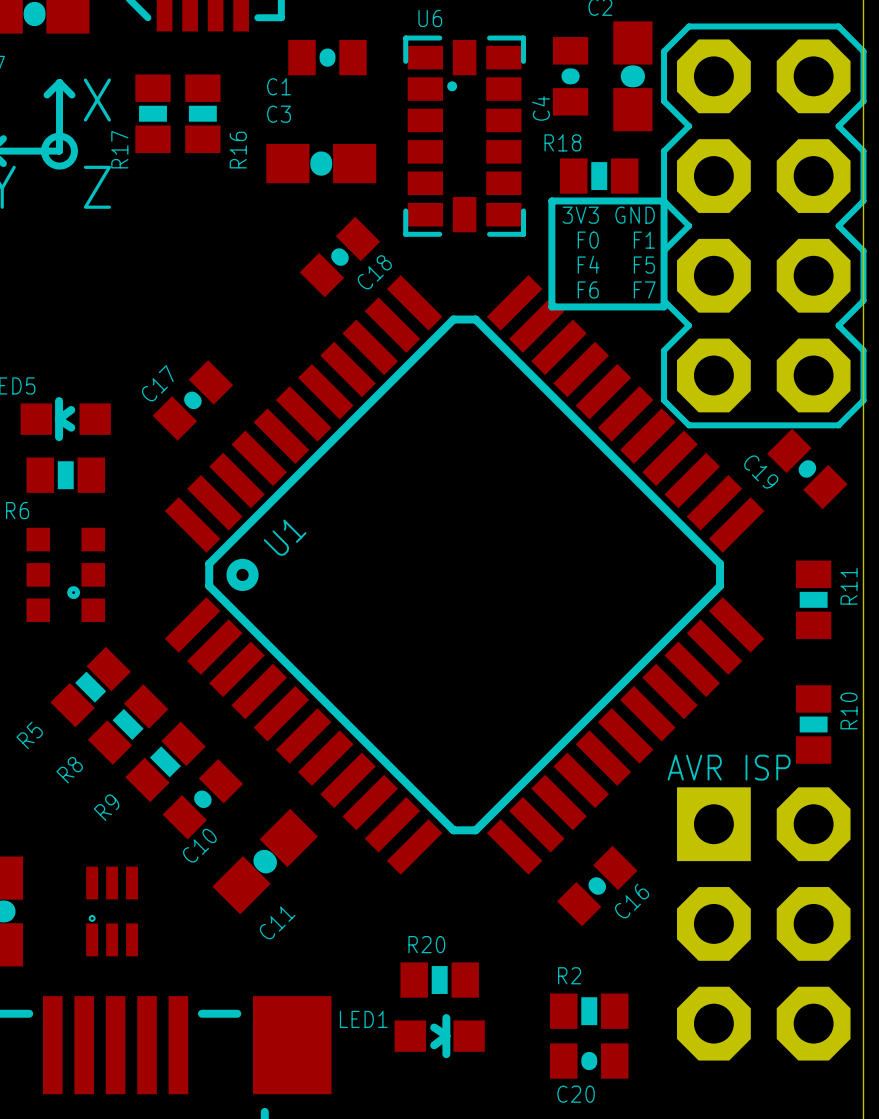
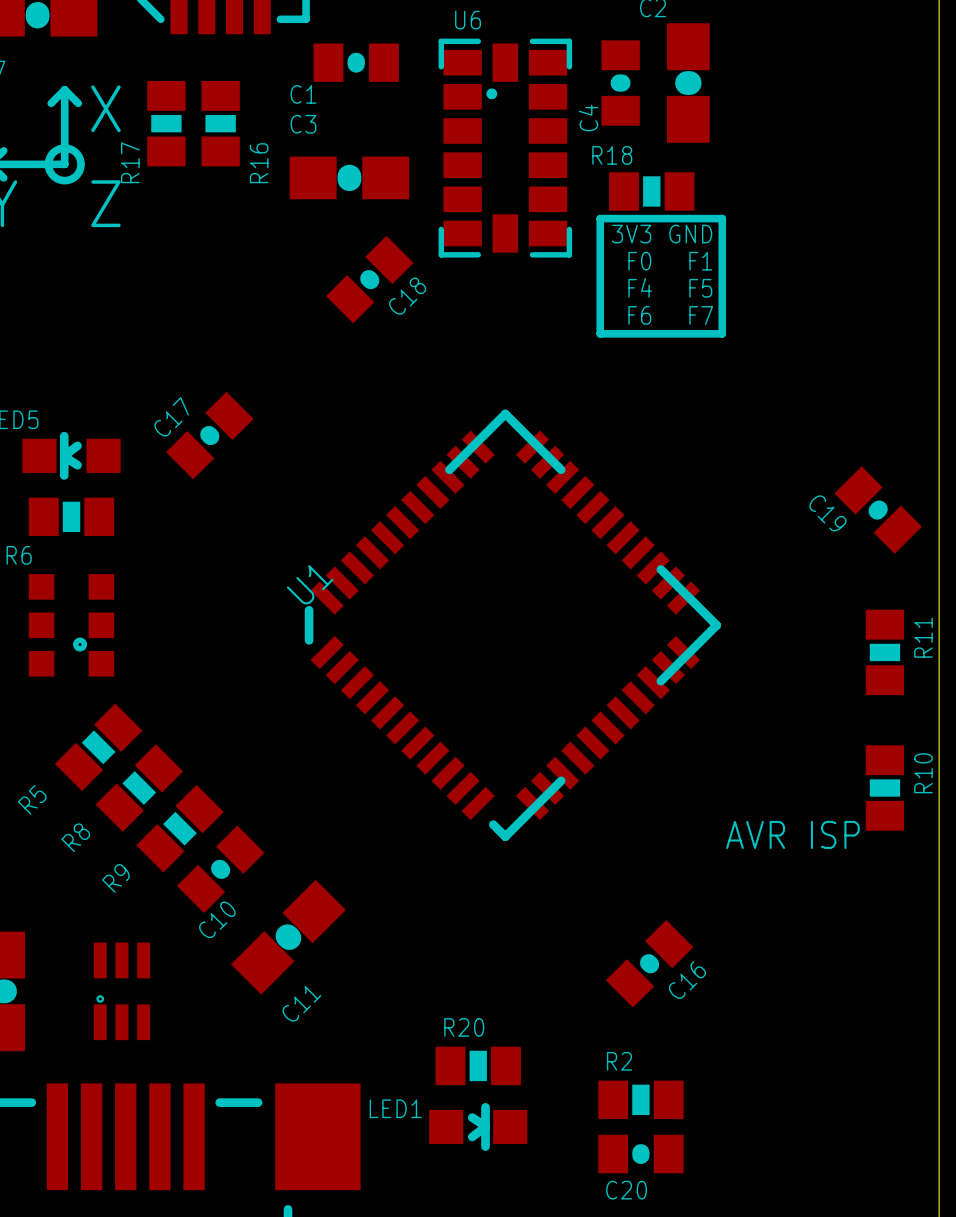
part: (763, 225) -> none
U1 footprint: [164, 275, 765, 875] -> [304, 409, 722, 842]
part: (763, 923) -> none

